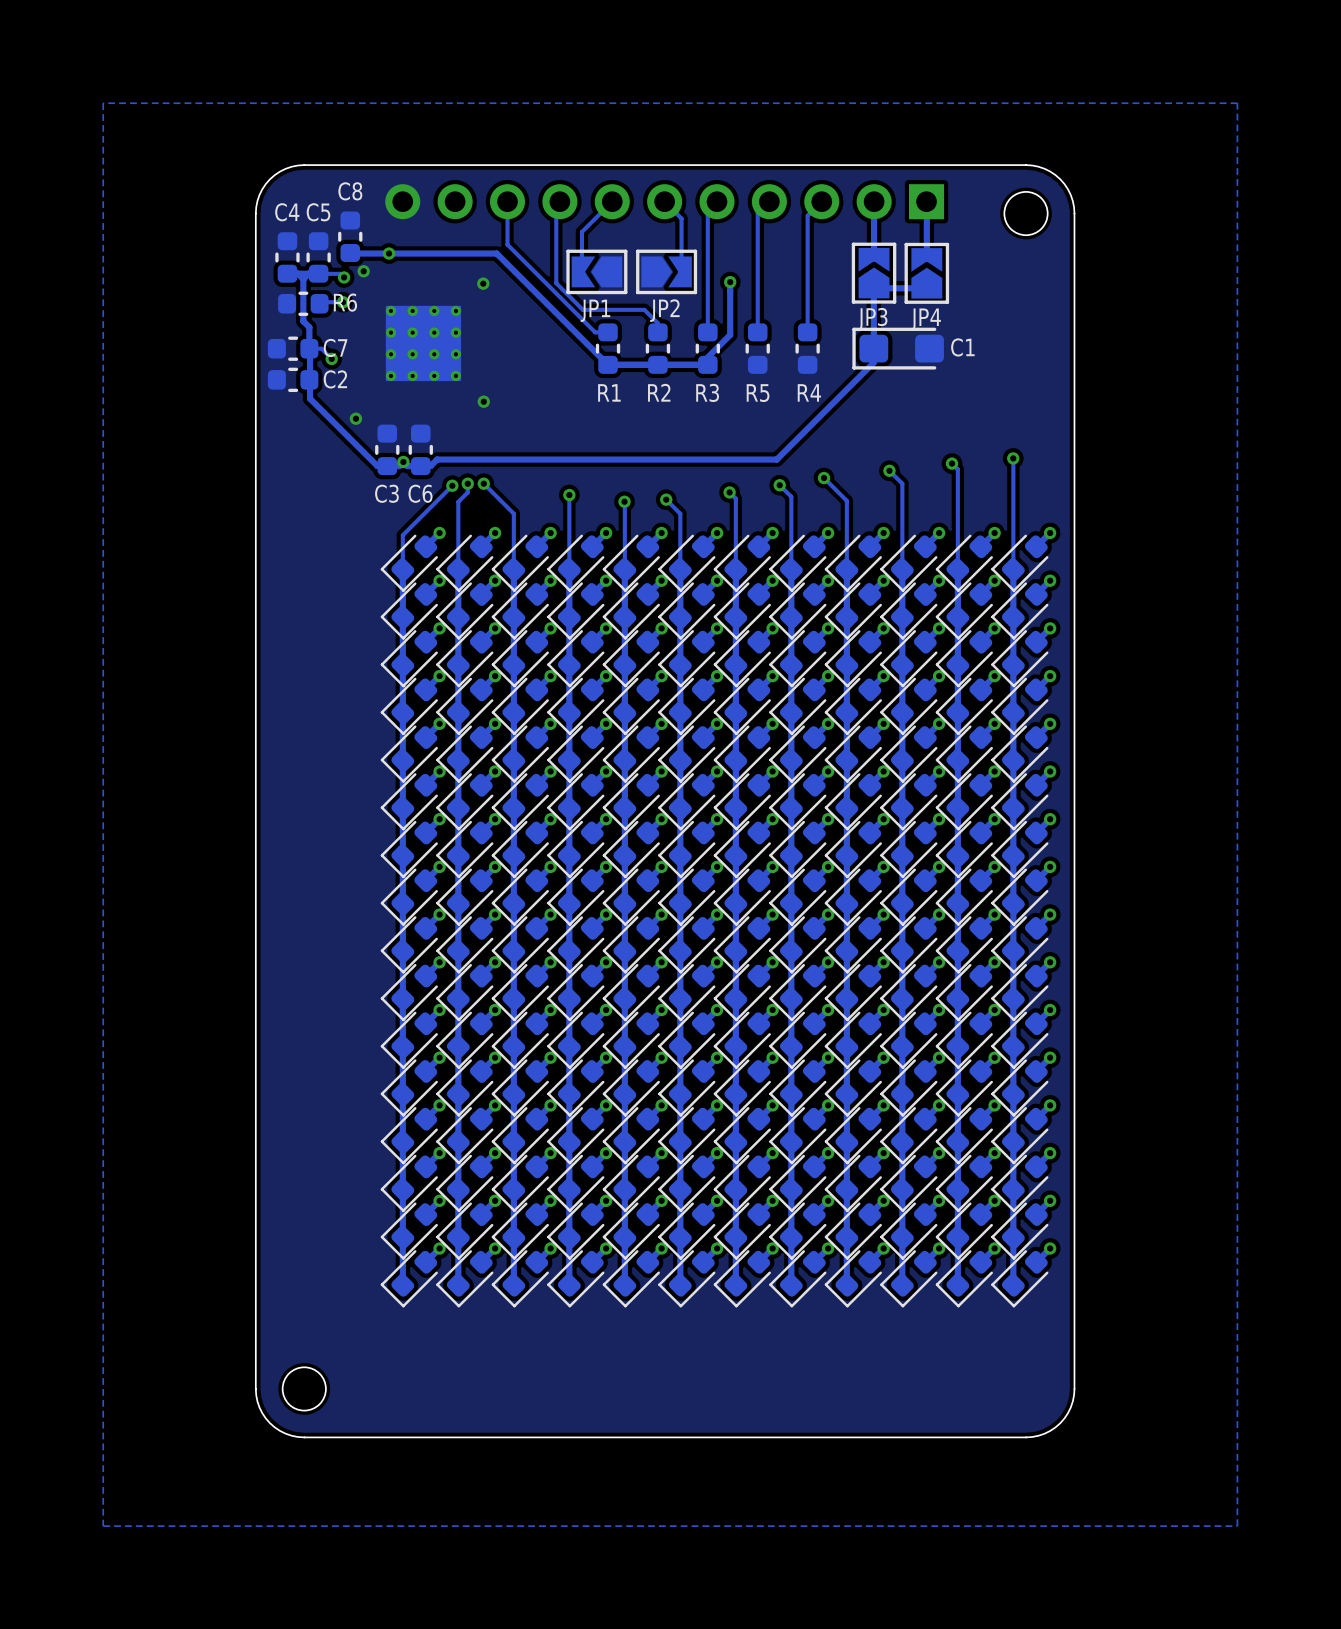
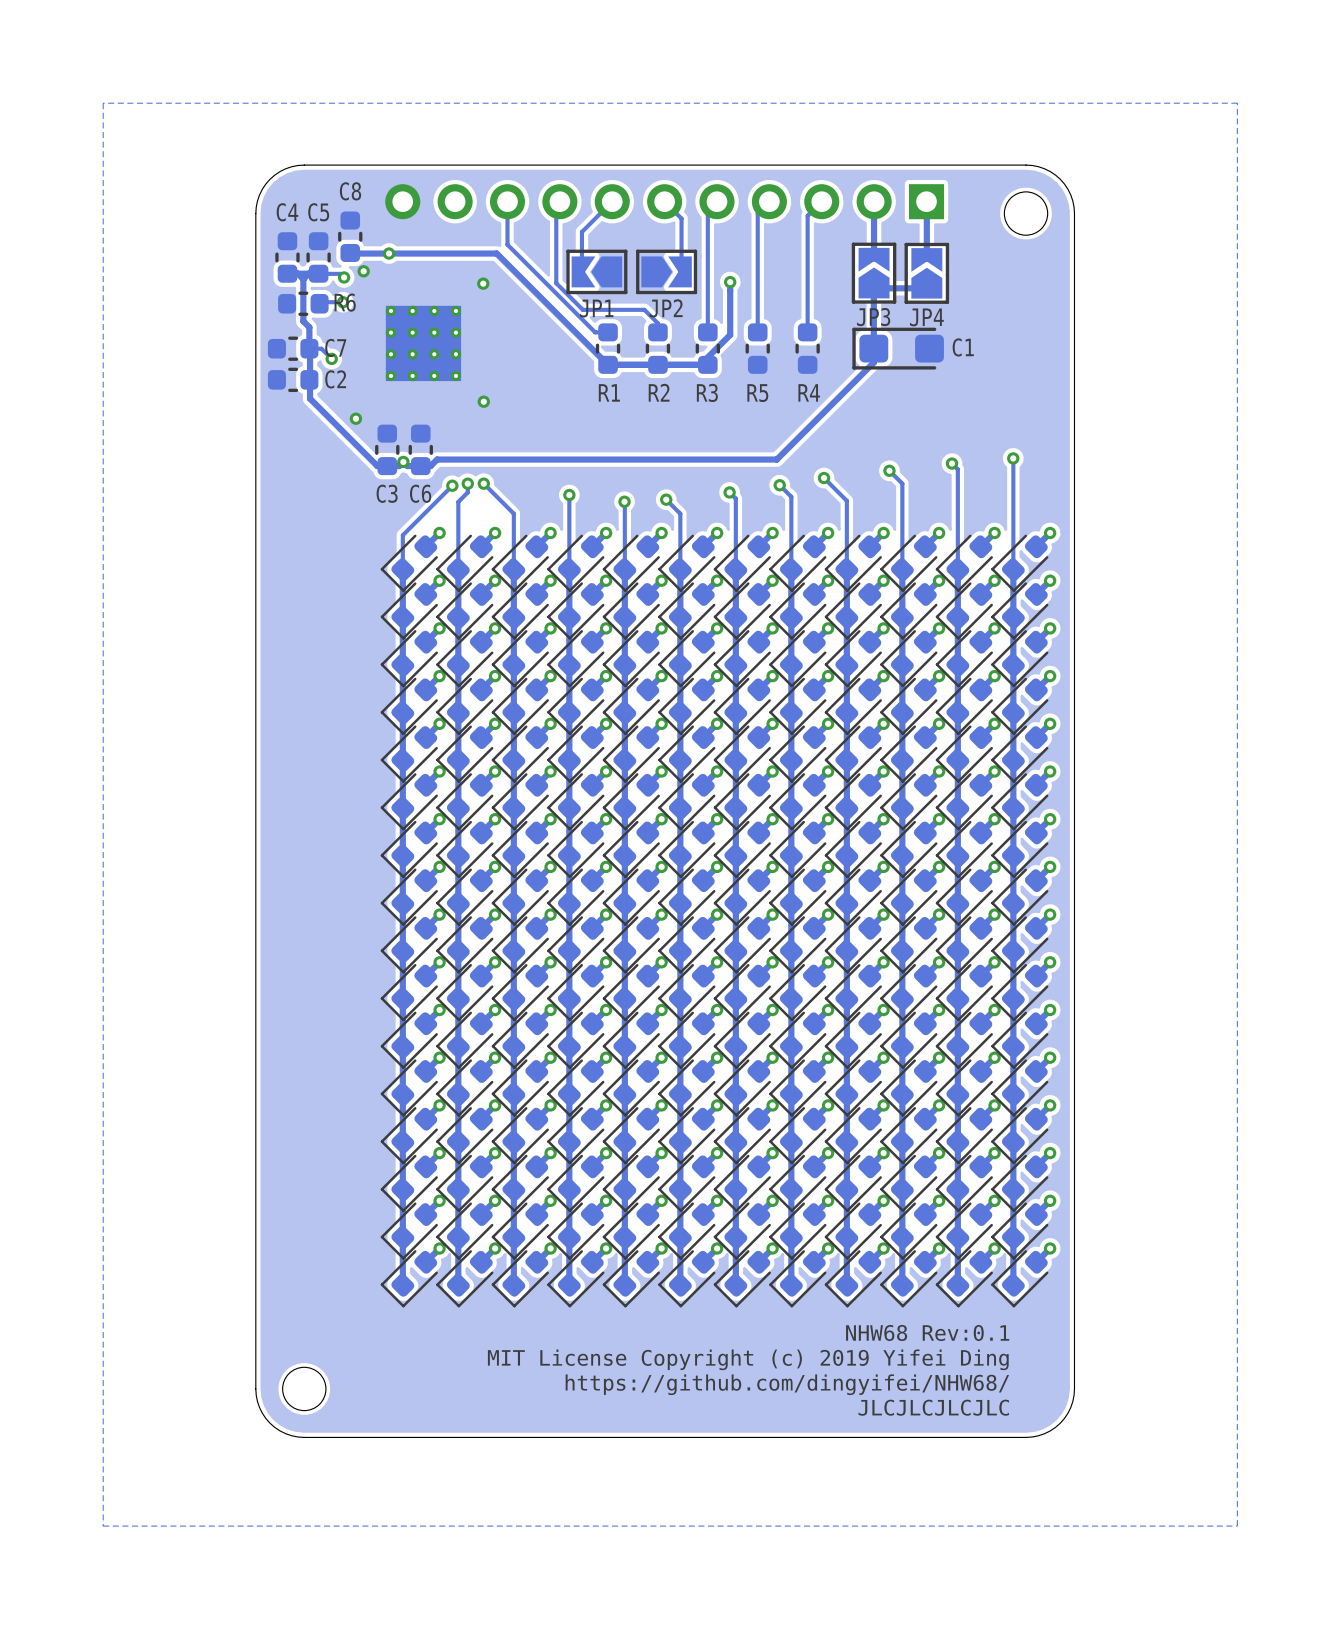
text: none -> NHW68 Rev:0.1 (927, 1332)
text: none -> MIT License Copyright (c) 2019 Yifei Ding (748, 1359)
text: none -> https://github.com/dingyifei/NHW68/ (787, 1384)
text: none -> JLCJLCJLCJLC (933, 1407)

